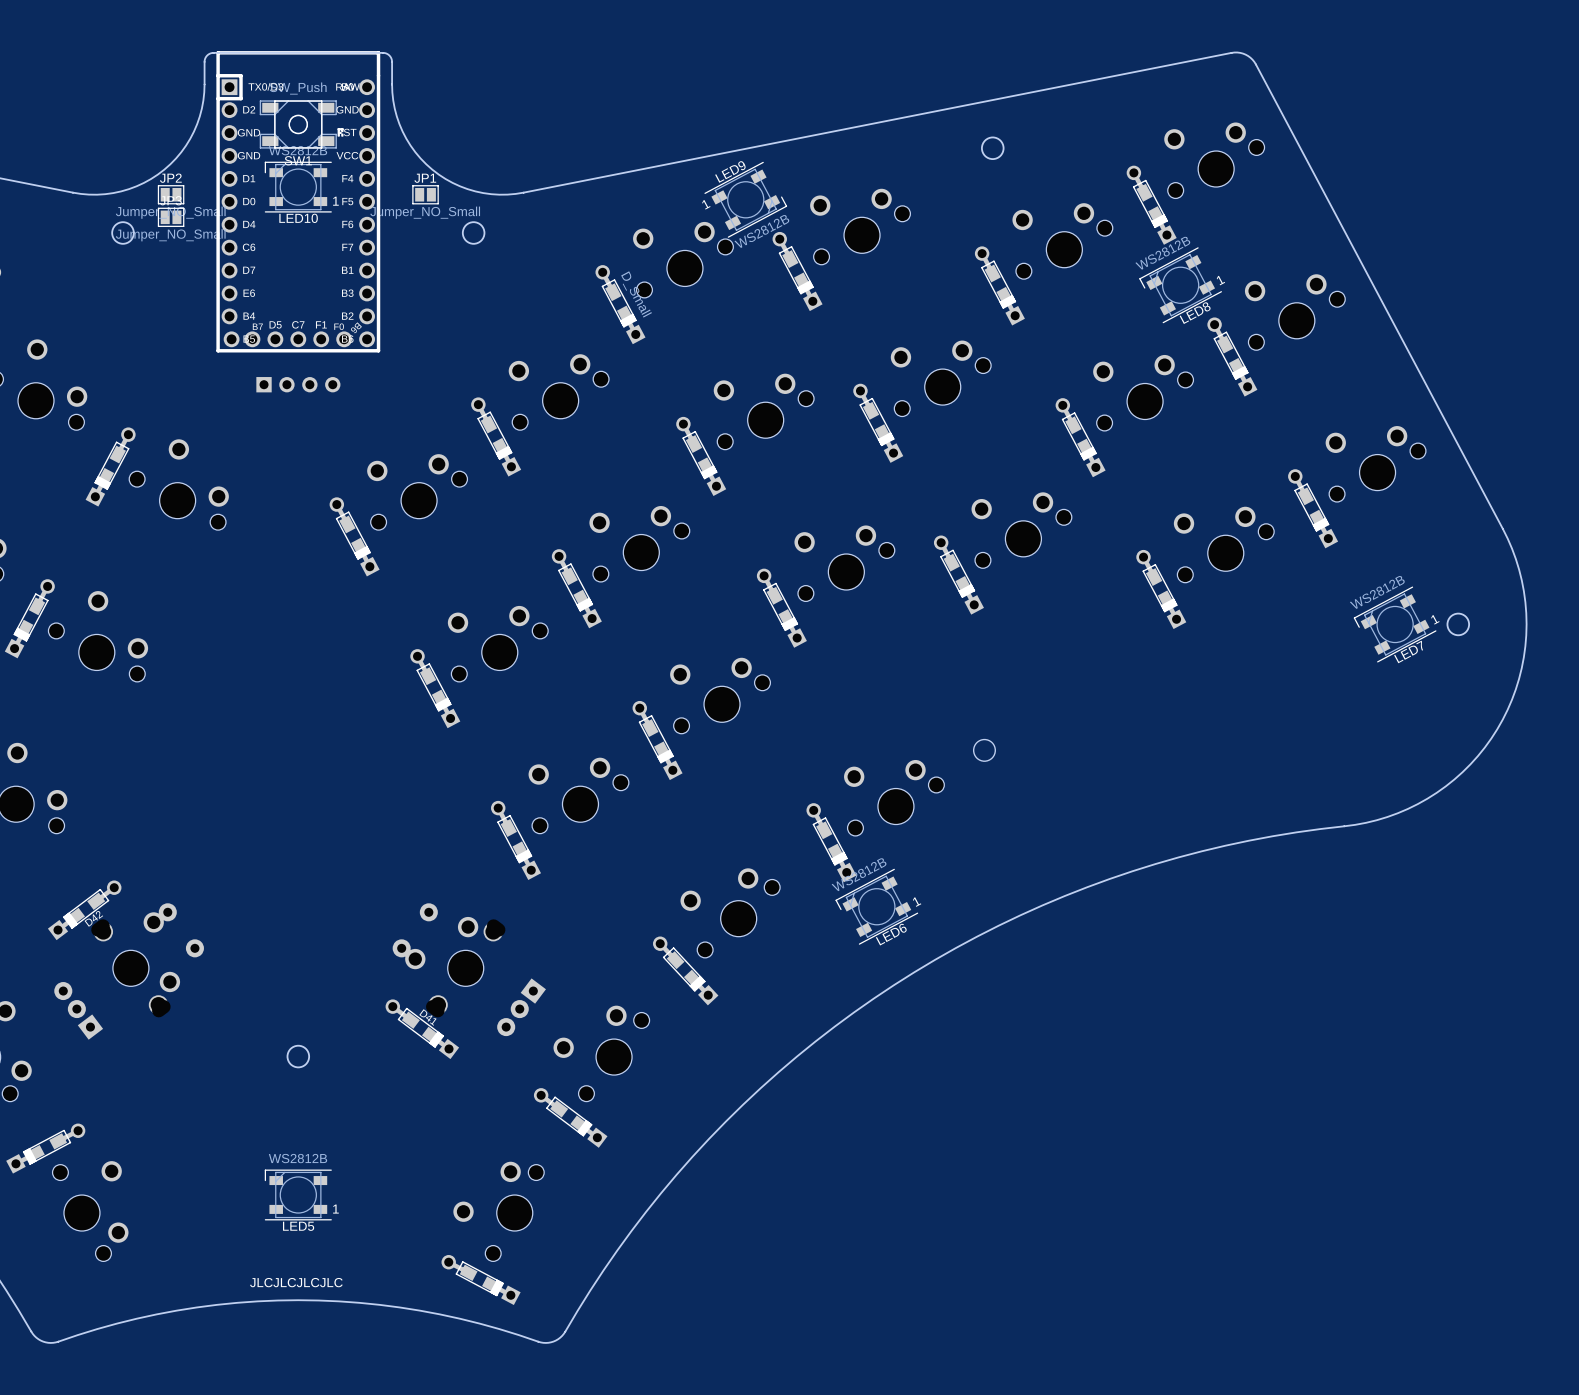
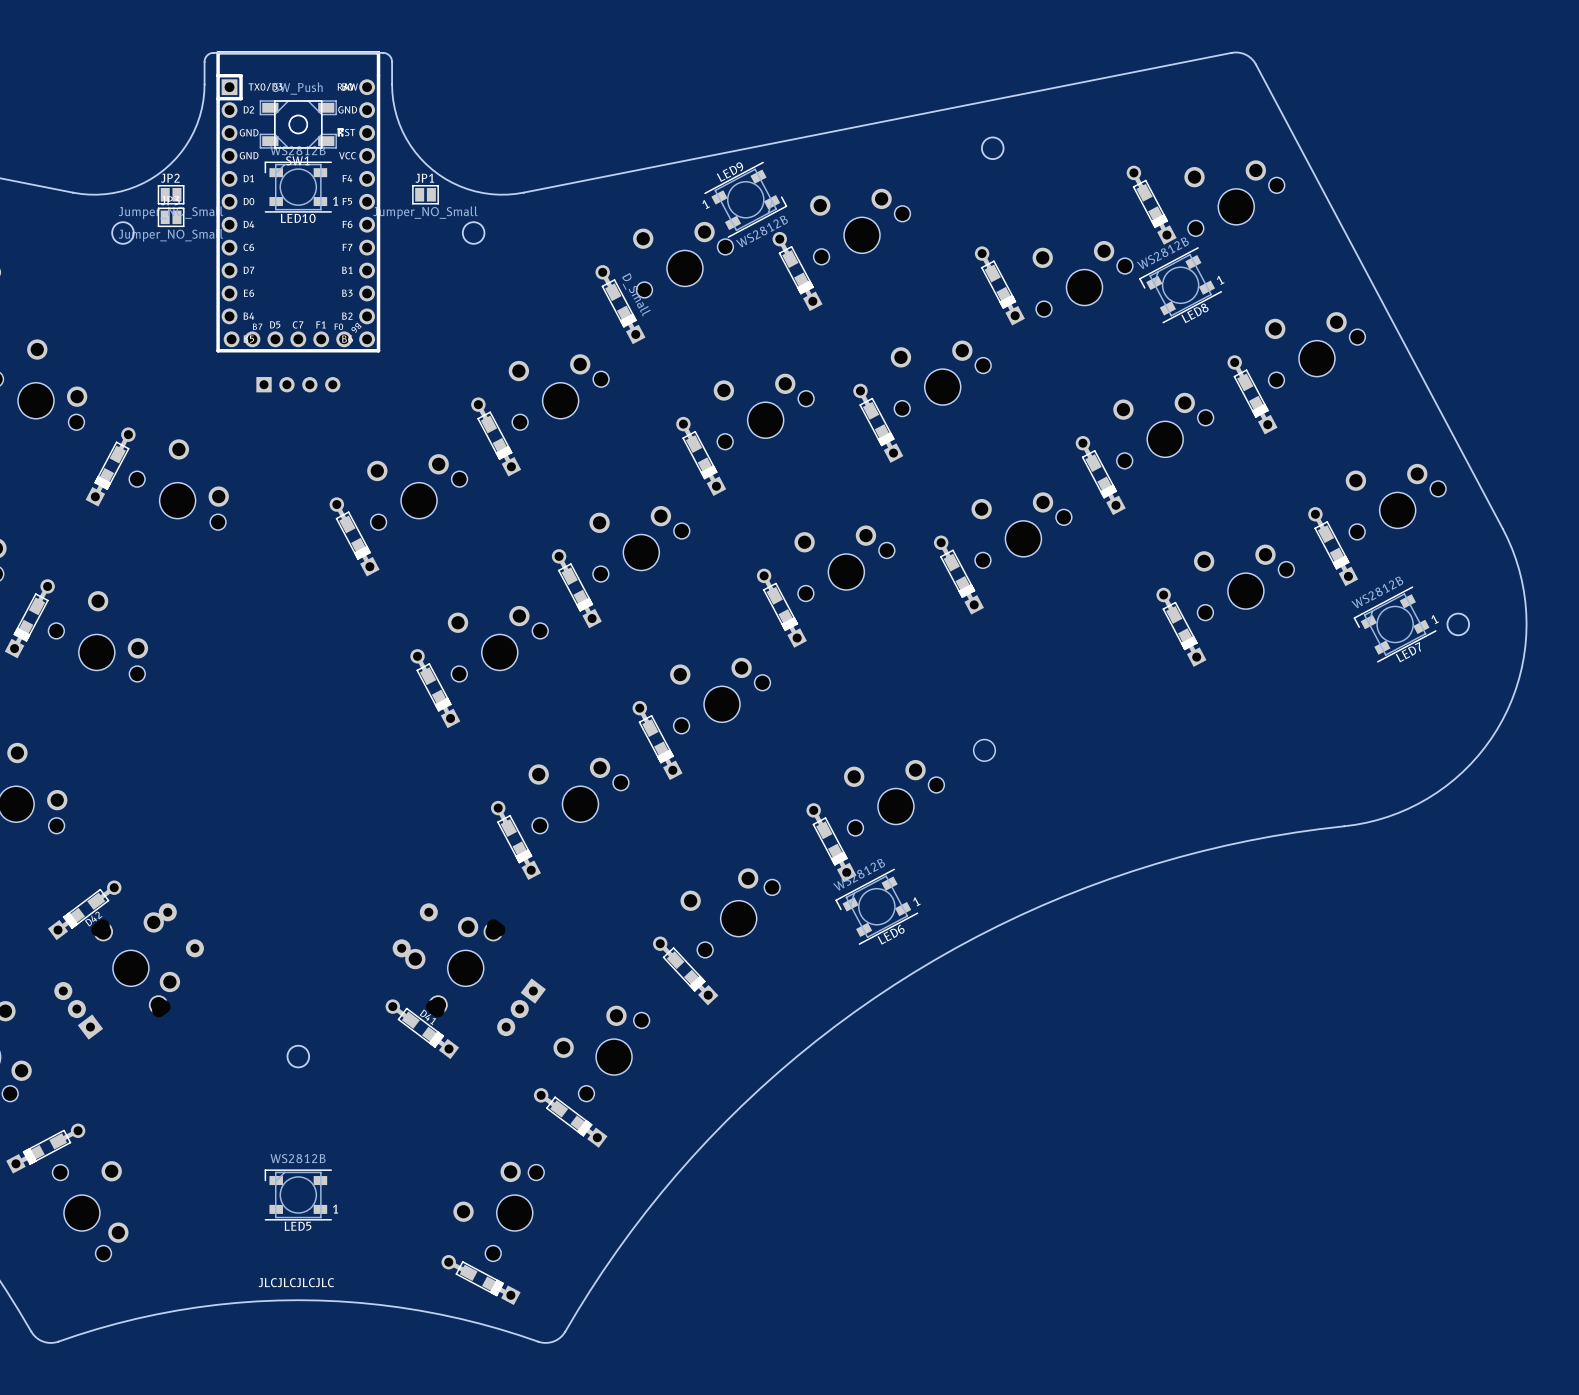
part position: (1214, 160) -> (1234, 198)
part position: (1062, 241) -> (1082, 279)
part position: (1295, 312) -> (1315, 350)
part position: (1232, 357) -> (1252, 394)
part position: (1143, 392) -> (1163, 430)
part position: (1080, 437) -> (1100, 475)
part position: (1375, 464) -> (1395, 501)
part position: (1313, 508) -> (1333, 546)
part position: (1224, 544) -> (1244, 582)
part position: (1161, 589) -> (1181, 627)

